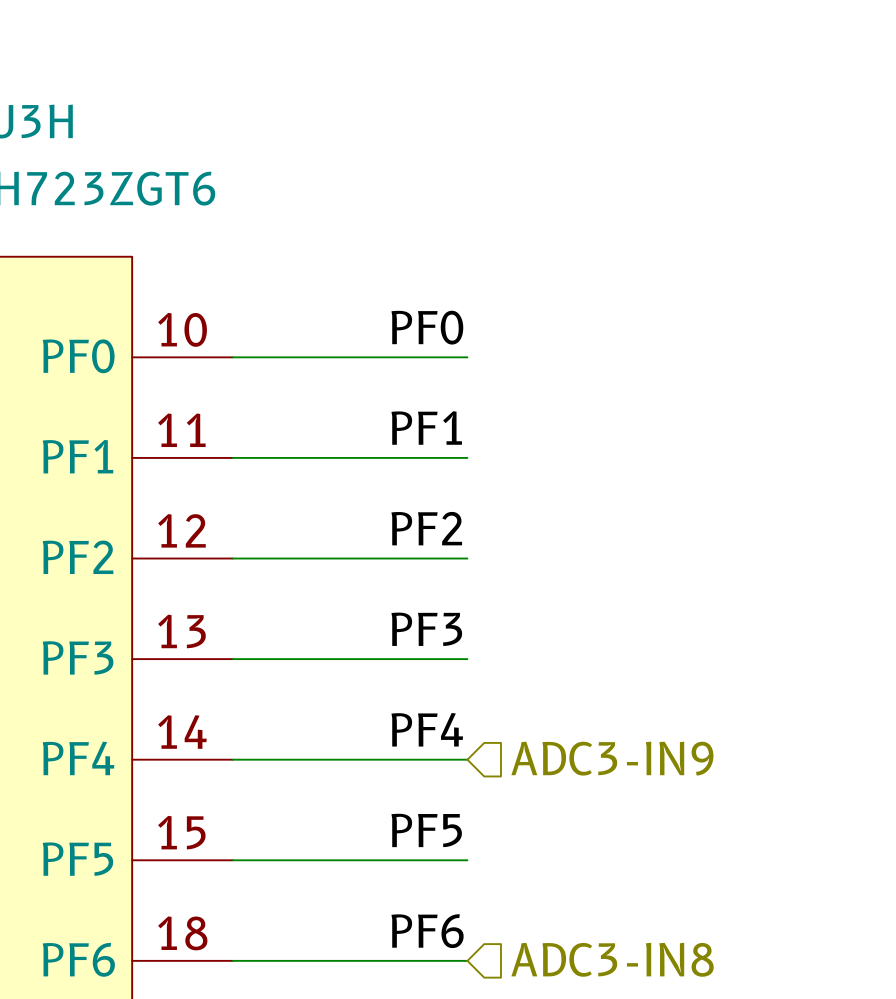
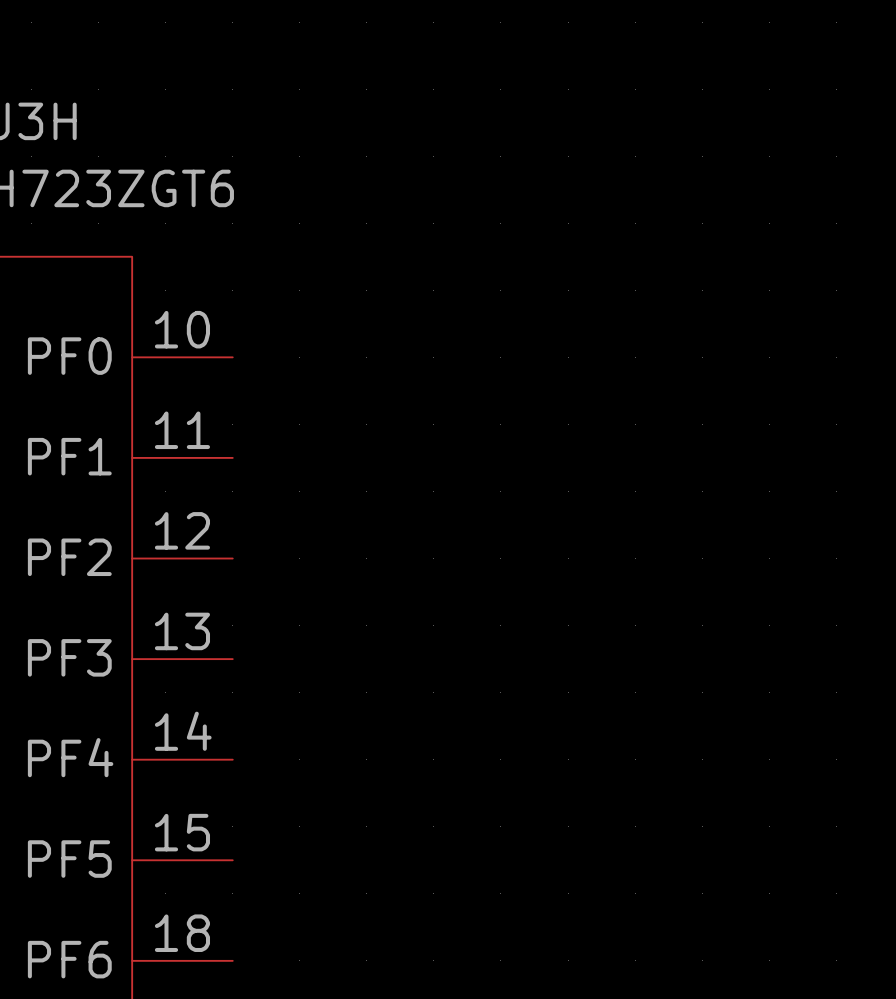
label: PF0 (427, 327) -> none
wire: (232, 357) (467, 357) -> none
label: PF1 (426, 428) -> none
wire: (232, 457) (467, 457) -> none
label: PF2 (426, 528) -> none
wire: (232, 558) (467, 558) -> none
label: PF3 (426, 629) -> none
wire: (232, 659) (467, 659) -> none
label: PF4 (427, 729) -> none
hierarchical label: ADC3-IN9 (612, 758) -> none
wire: (232, 759) (467, 759) -> none
label: PF5 (426, 830) -> none
wire: (232, 860) (467, 860) -> none
label: PF6 (427, 931) -> none
hierarchical label: ADC3-IN8 (612, 959) -> none
wire: (232, 960) (467, 960) -> none

